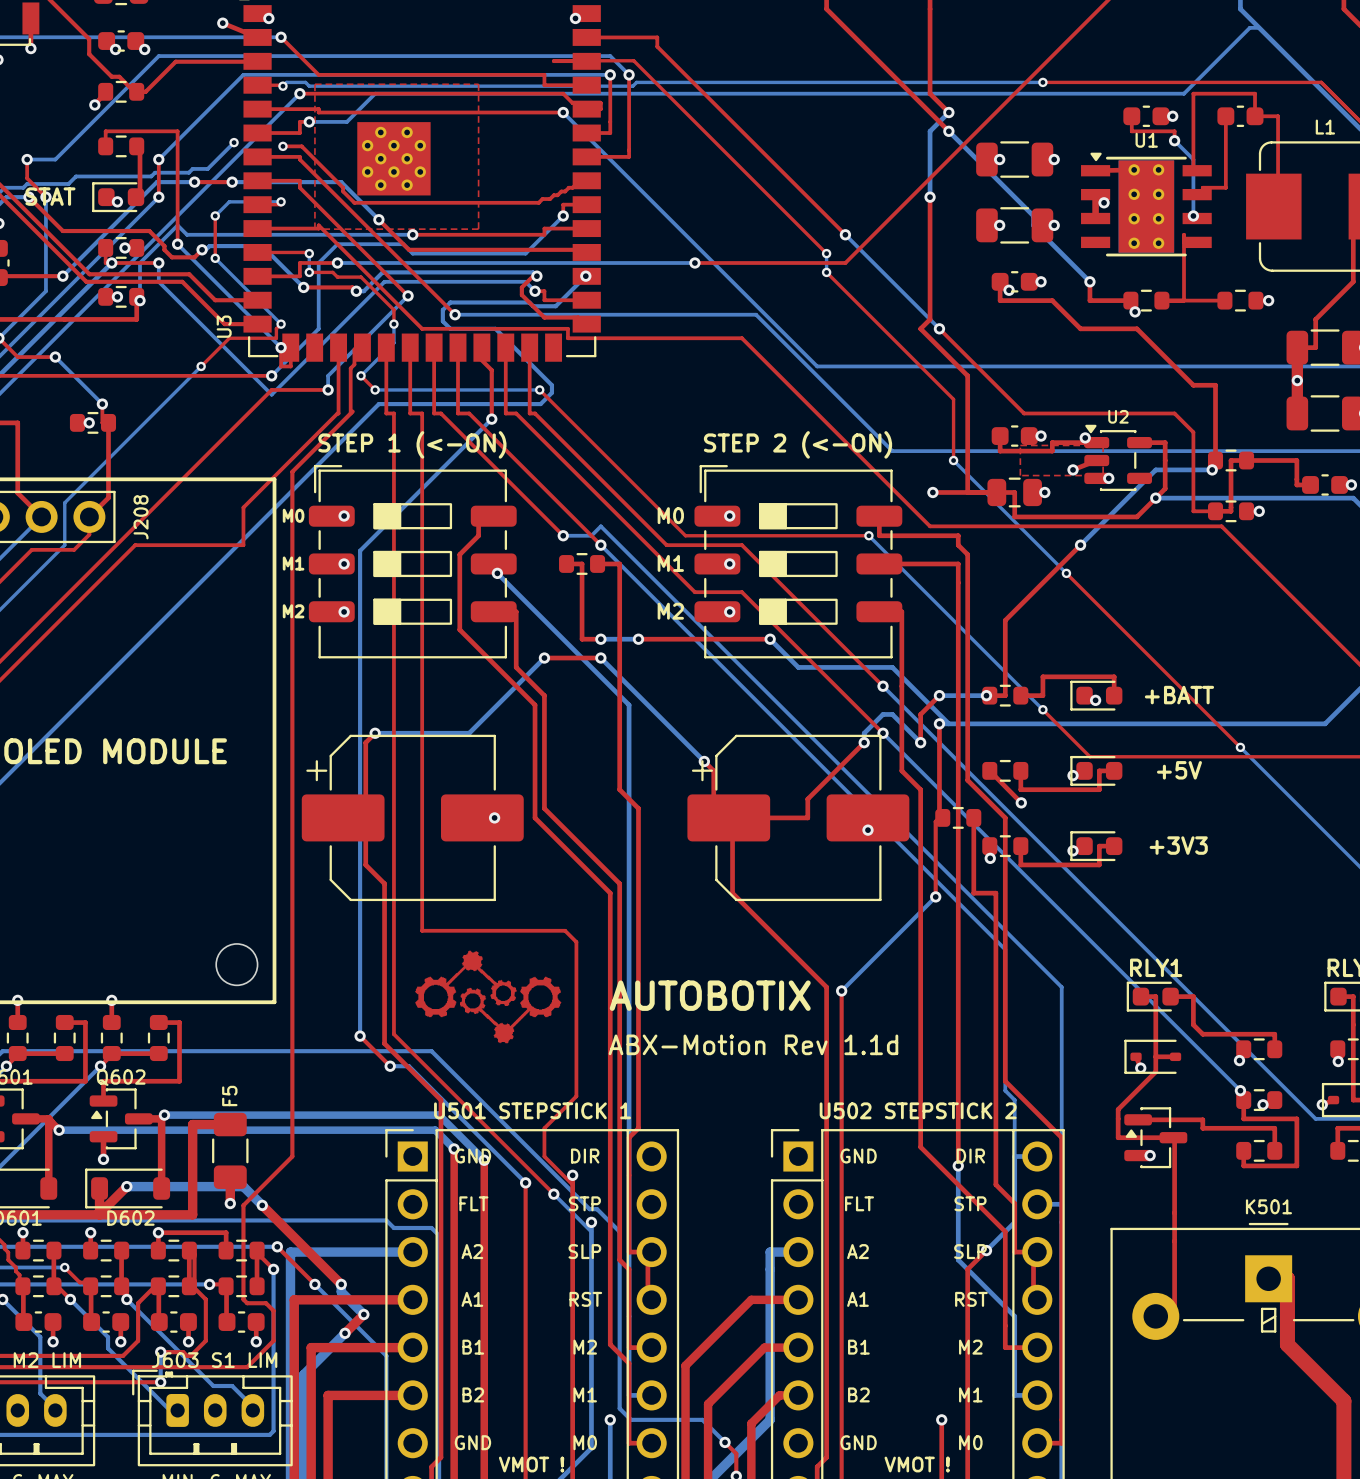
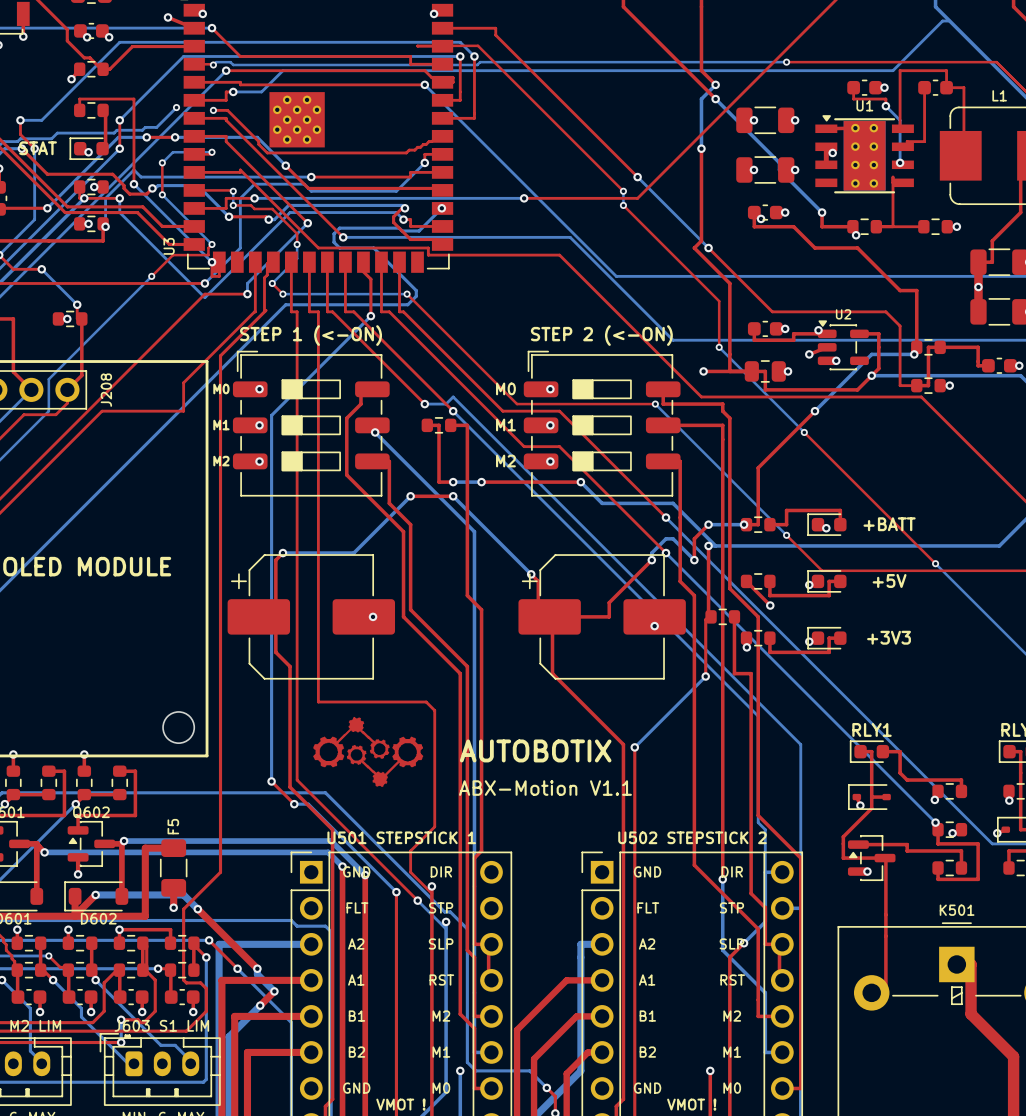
top zone outline: (314, 84) (478, 84) (478, 229) (314, 229) (314, 84) -> none
top zone outline: (1020, 445) (1103, 445) (1103, 475) (1020, 475) (1020, 445) -> none
text: ABX-Motion Rev 1.1d (753, 1044) -> ABX-Motion V1.1 (545, 788)

